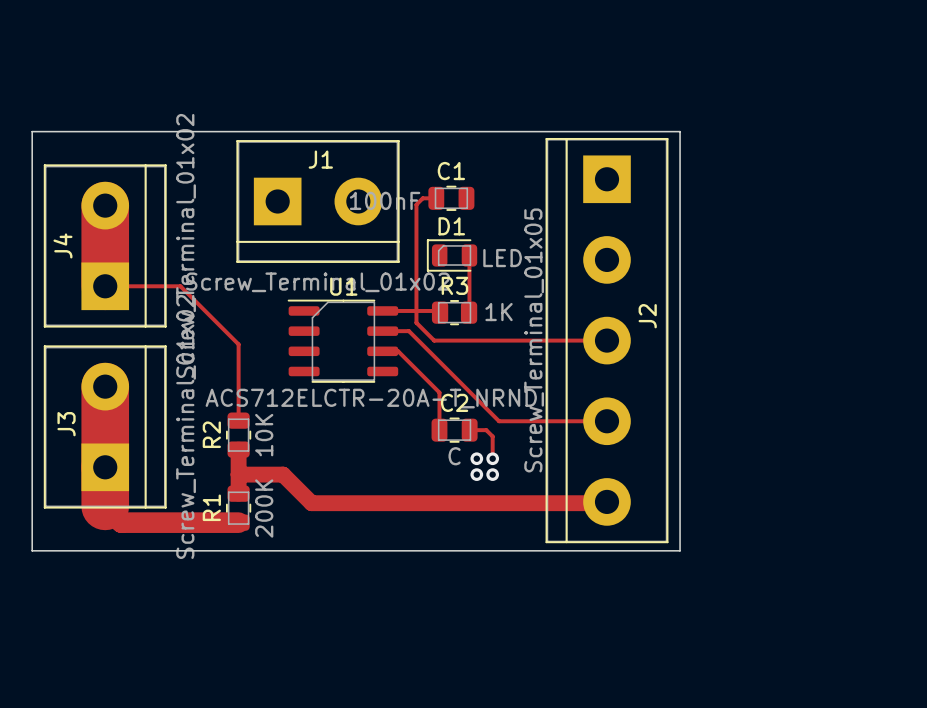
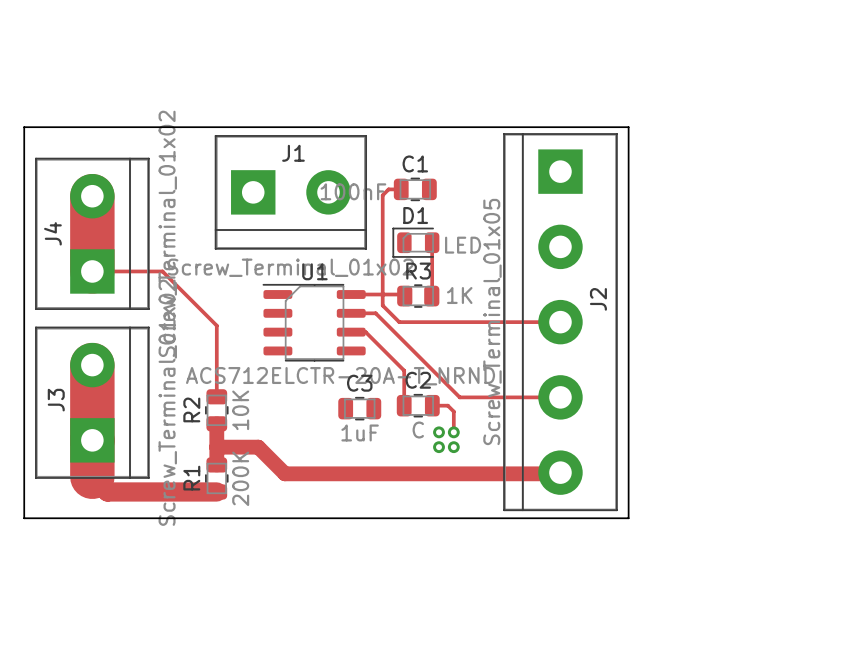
C3: none -> 1uF (359, 408)

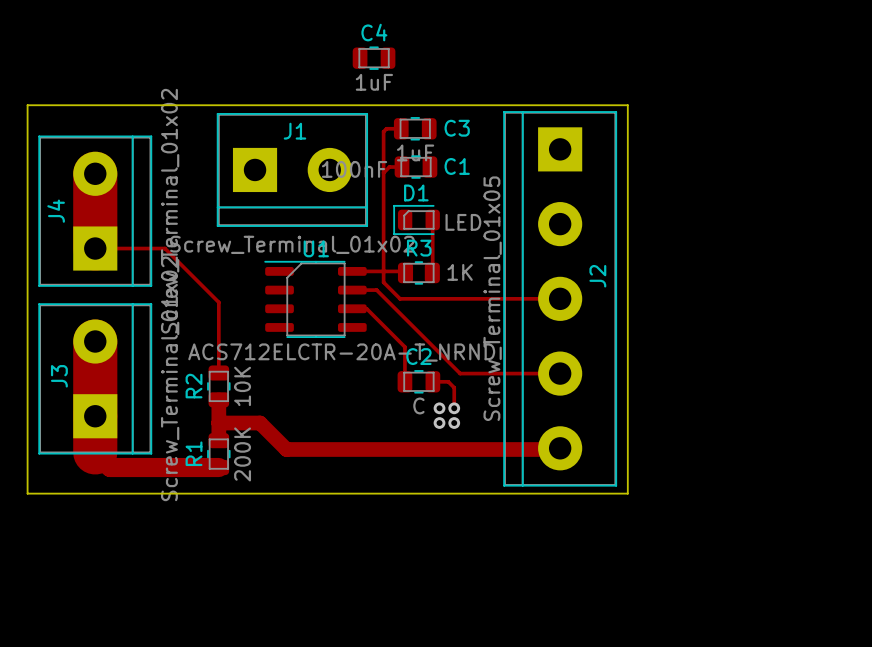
C4: none -> 1uF (374, 58)
track: none -> (401, 128) (386, 128) (383, 131) (383, 172)
C1 name position: C1 (415, 163) -> C1 (457, 166)
C3 name position: C3 (359, 383) -> C3 (457, 128)
C3 position: (359, 408) -> (415, 128)

